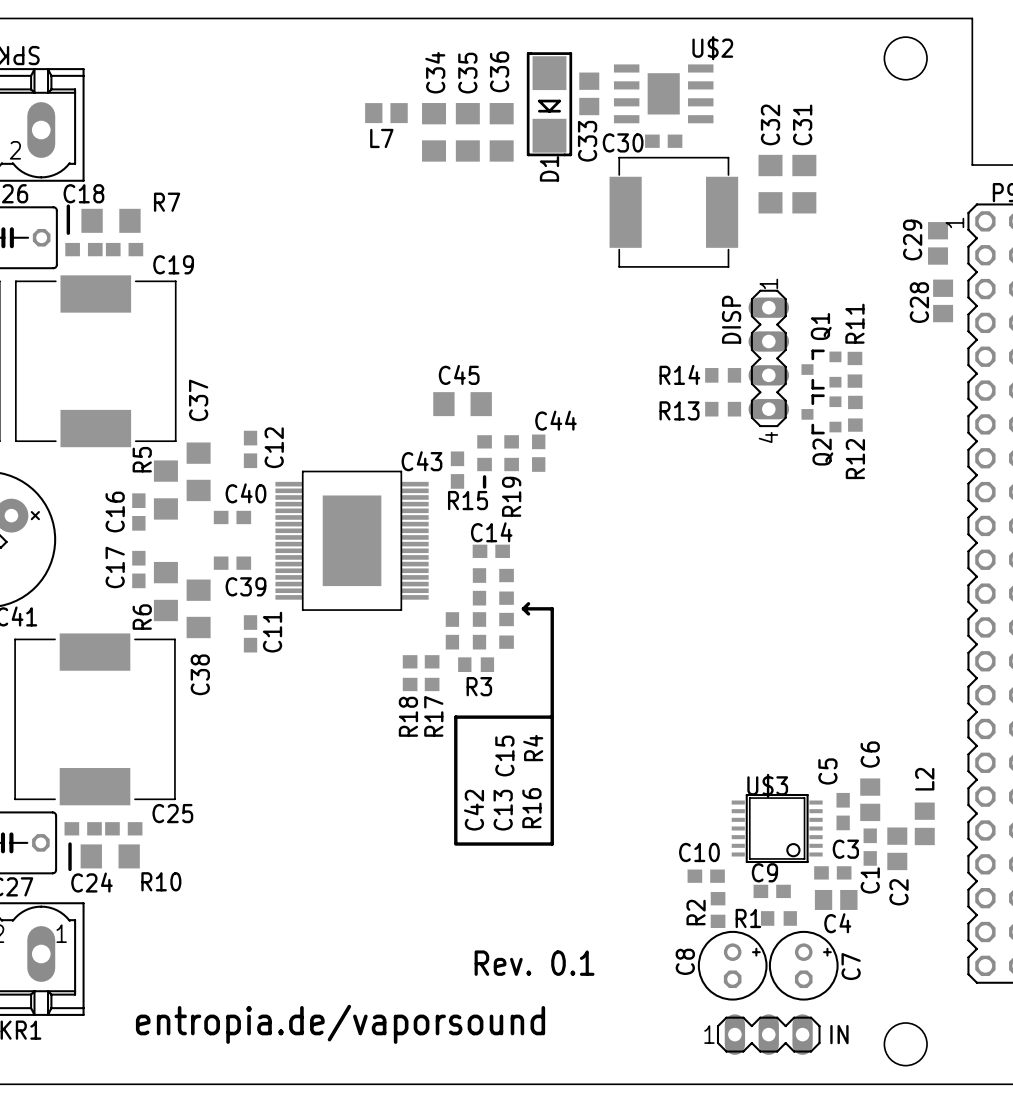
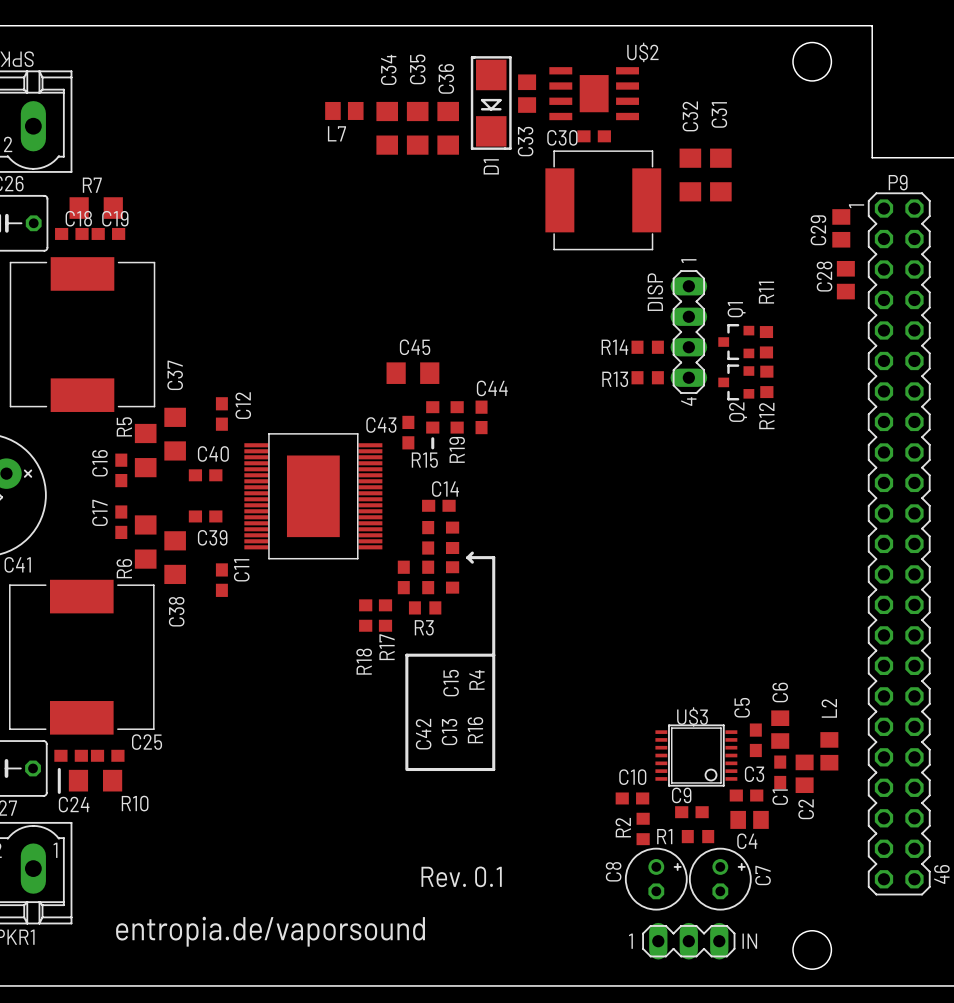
C18 name position: C18 (83, 193) -> C18 (78, 218)
R7 name position: R7 (167, 202) -> R7 (92, 185)
line: (68, 206) (68, 233) -> none
C19 name position: C19 (173, 264) -> C19 (115, 218)

